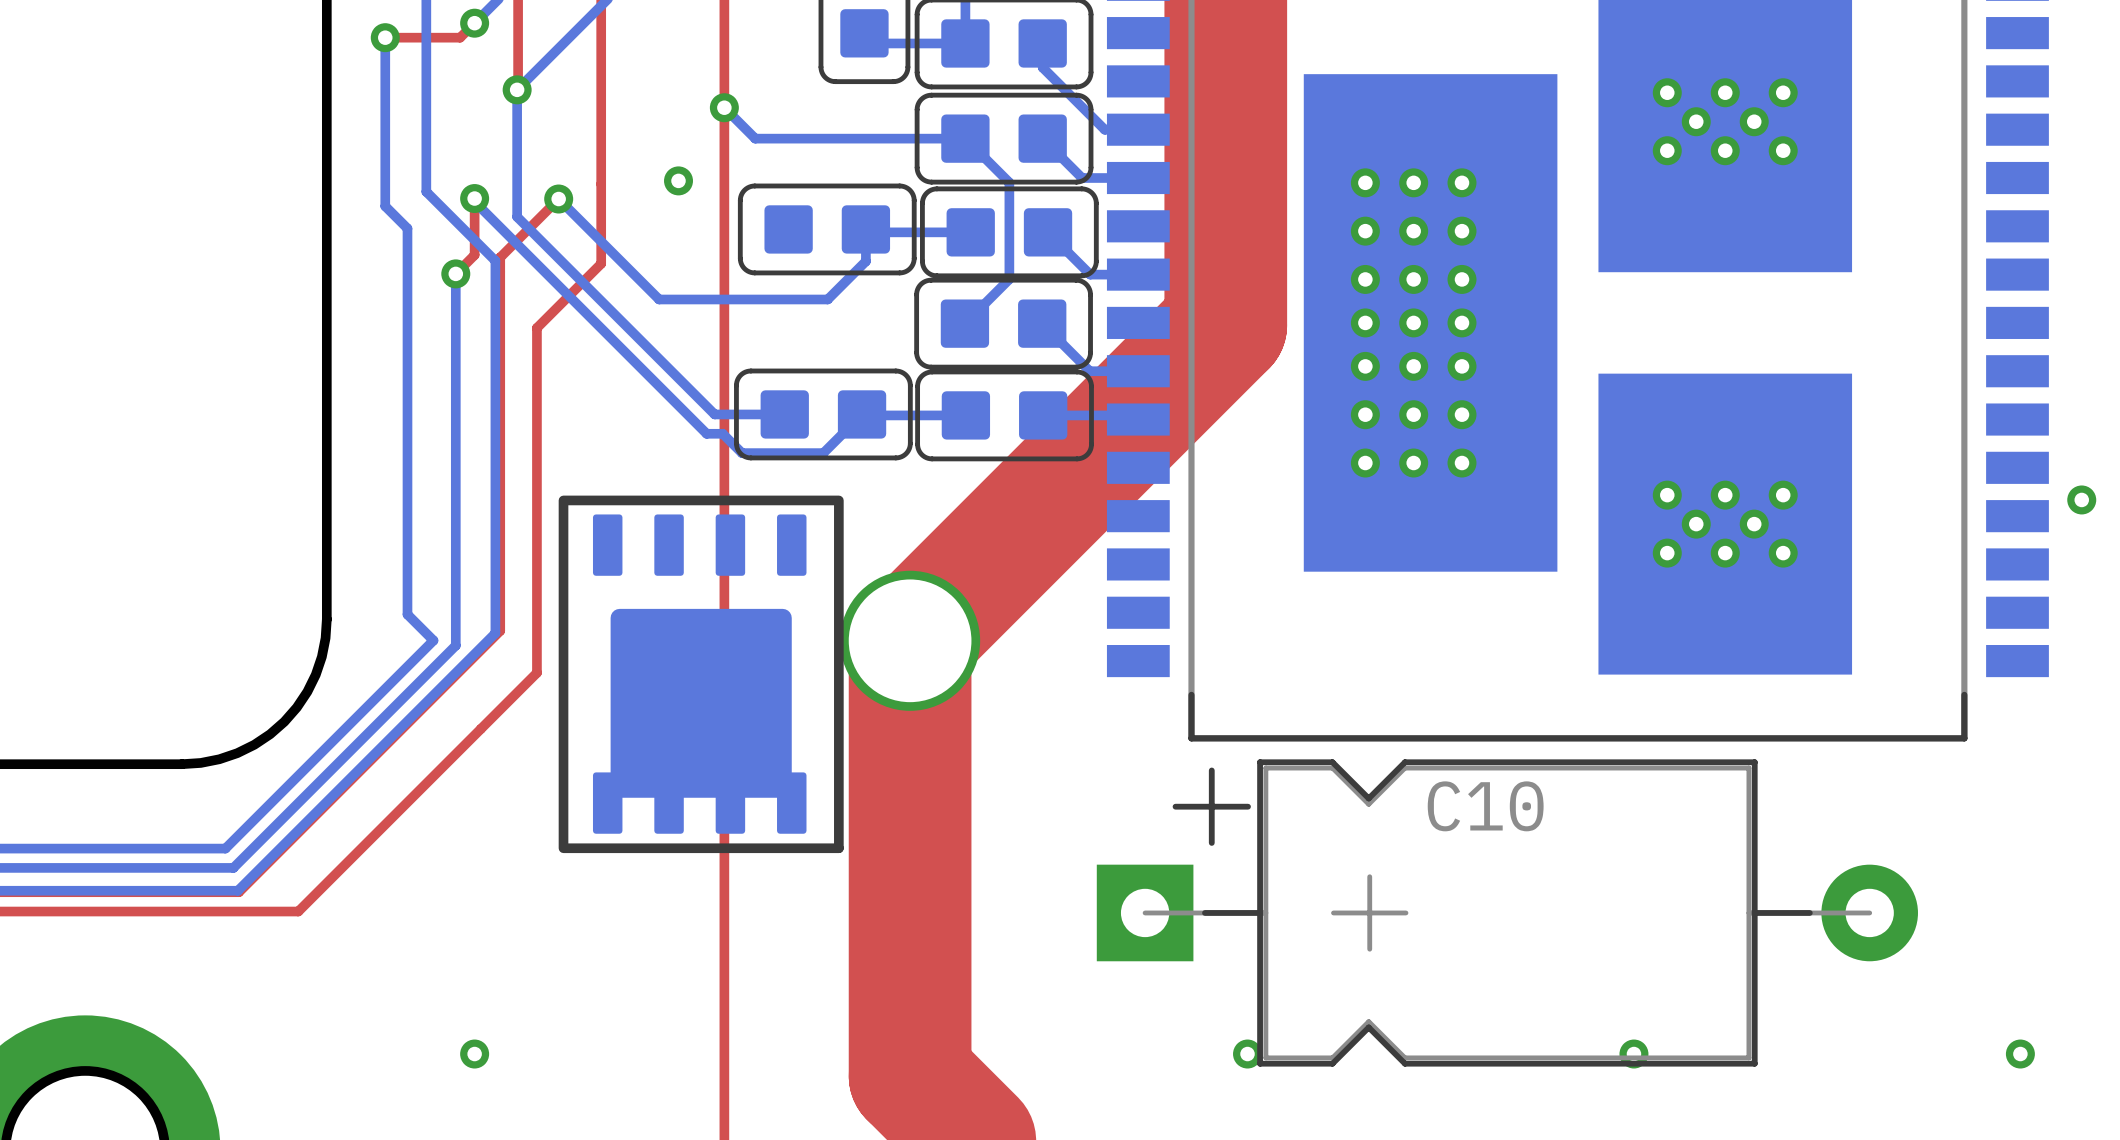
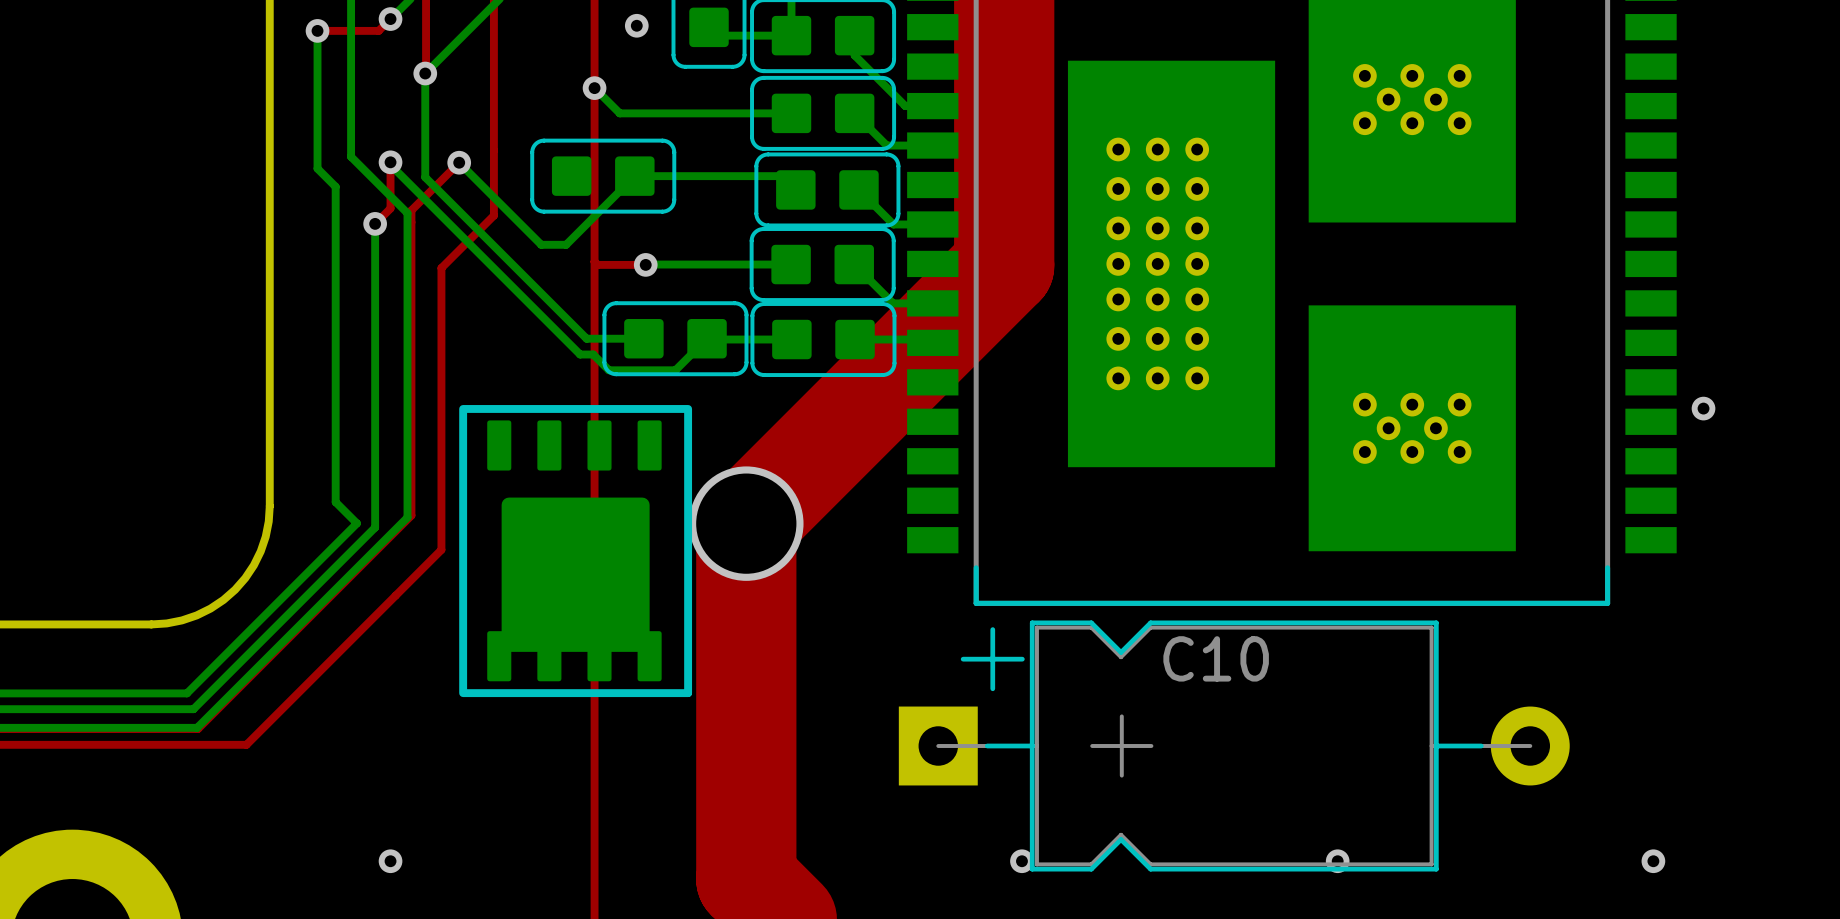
via: none -> (636, 25)
bottom track: (965, 138) (1009, 182) (1009, 279) (964, 323) -> (645, 264) (791, 264)
via: (678, 180) -> none
part position: (827, 229) -> (603, 176)
bottom track: (970, 232) (868, 232) (865, 229) (865, 261) (827, 299) (689, 299) -> (795, 189) (782, 176) (634, 176) (566, 244)
top track: none -> (594, 261) (597, 264) (645, 264)
via: none -> (645, 264)

